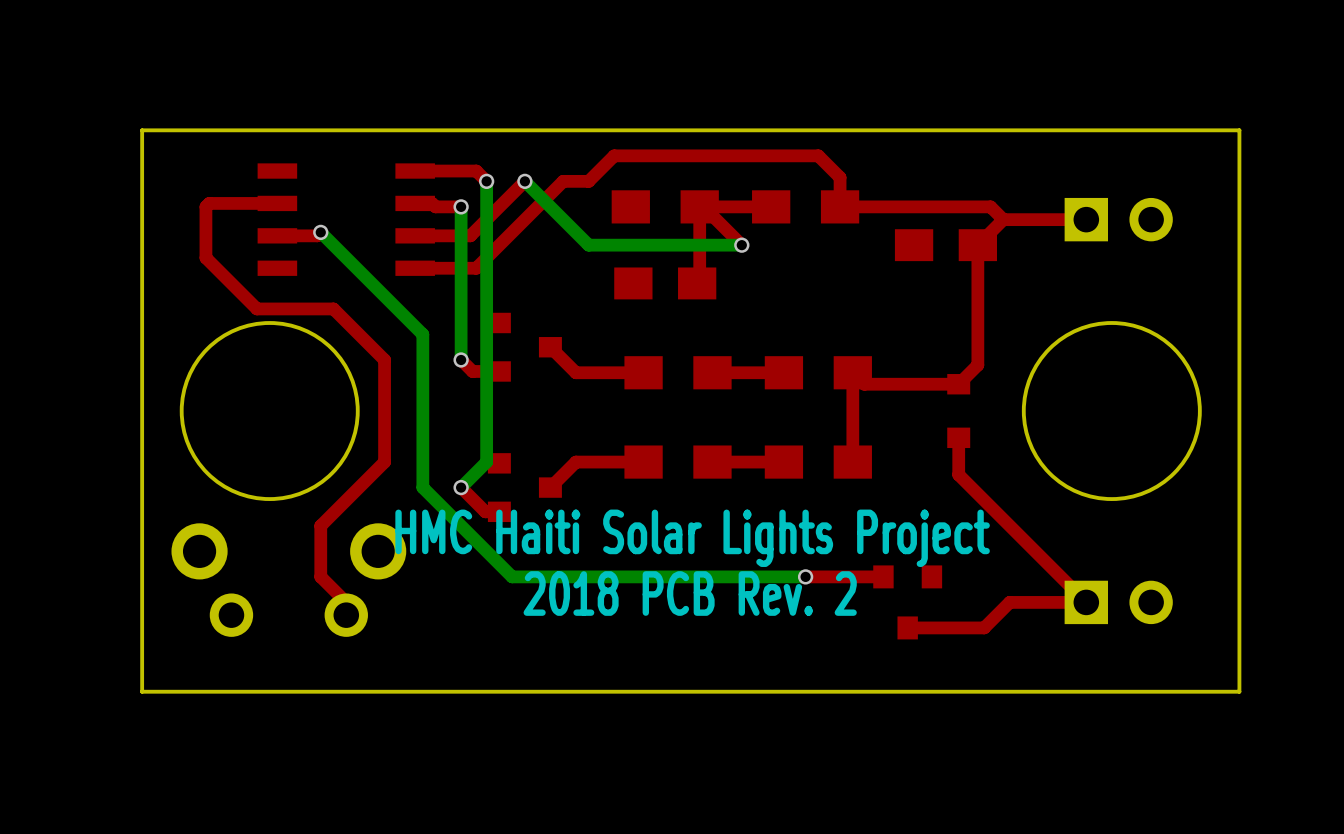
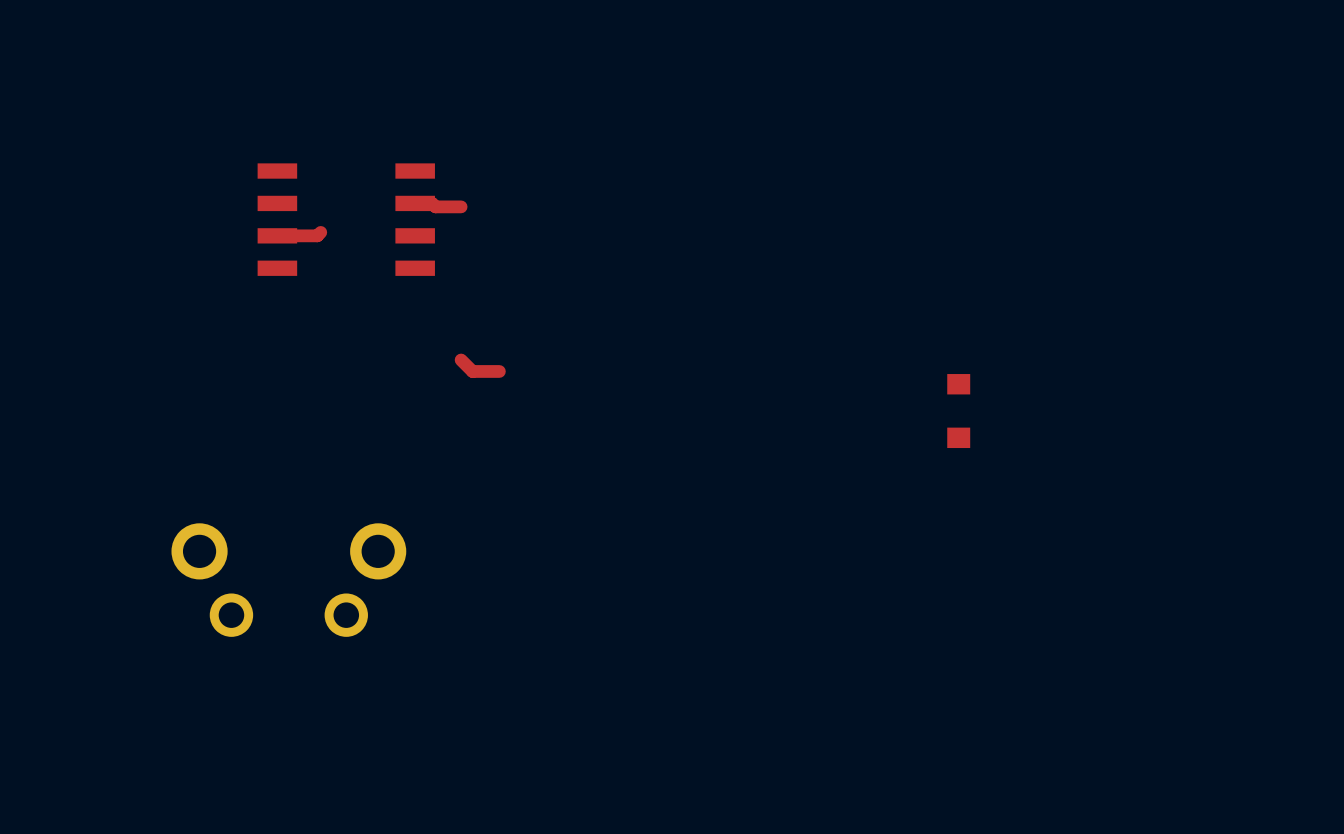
board edge: (1239, 130) (142, 130) (142, 691) (1239, 691) (1239, 130) -> none
top track: (415, 171) (476, 171) (486, 181) -> none
bottom track: (486, 181) (486, 462) (461, 487) -> none
via: (486, 181) -> none
top track: (524, 181) (470, 235) (415, 235) -> none
bottom track: (524, 181) (588, 245) (741, 245) -> none
via: (524, 181) -> none
top track: (277, 203) (209, 203) (205, 206) (205, 257) (256, 308) (333, 308) (384, 359) (384, 462) (320, 525) (320, 576) (346, 602) (346, 615) -> none
bottom track: (461, 206) (461, 359) -> none
via: (461, 206) -> none
part: (665, 206) -> none
top track: (703, 206) (741, 245) -> none
top track: (771, 206) (699, 206) (699, 280) (697, 283) -> none
part: (805, 206) -> none
top track: (1003, 219) (990, 206) (840, 206) (840, 177) (818, 155) (614, 155) (588, 181) (563, 181) (476, 268) (415, 268) -> none
top track: (1003, 219) (977, 245) (977, 365) (958, 384) (864, 384) (852, 372) (852, 462) -> none
top track: (1086, 219) (1003, 219) -> none
part: (1118, 219) -> none
bottom track: (320, 232) (422, 334) (422, 487) (512, 576) (805, 576) -> none
via: (320, 232) -> none
via: (741, 245) -> none
part: (945, 245) -> none
part: (665, 283) -> none
round board edge: [179, 321, 360, 501] -> none
round board edge: [1021, 321, 1202, 501] -> none
part: (524, 347) -> none
top track: (550, 347) (575, 372) (643, 372) -> none
via: (461, 359) -> none
part: (678, 372) -> none
top track: (783, 372) (712, 372) -> none
part: (818, 372) -> none
top track: (958, 437) (958, 474) (1086, 602) (1009, 602) (984, 627) (907, 627) -> none
top track: (643, 462) (575, 462) (550, 487) -> none
part: (678, 462) -> none
top track: (783, 462) (712, 462) -> none
part: (818, 462) -> none
top track: (461, 487) (485, 511) (499, 511) -> none
via: (461, 487) -> none
part: (524, 487) -> none
text: HMC Haiti Solar Lights Project (692, 538) -> none
via: (805, 576) -> none
top track: (883, 576) (805, 576) -> none
text: 2018 PCB Rev. 2 (690, 593) -> none
part: (907, 602) -> none
part: (1118, 602) -> none

